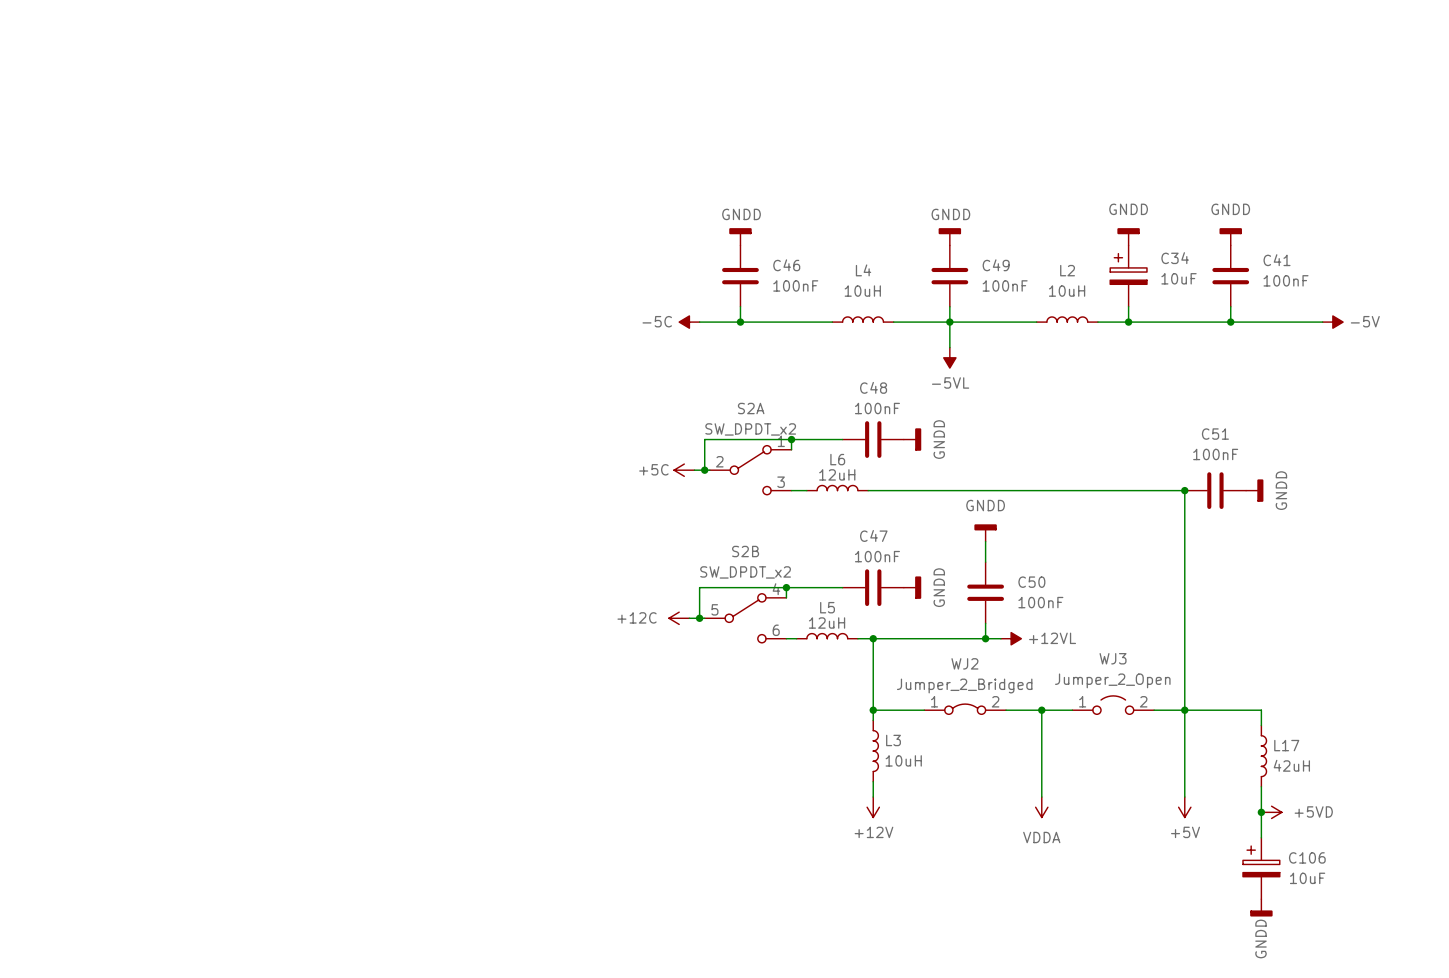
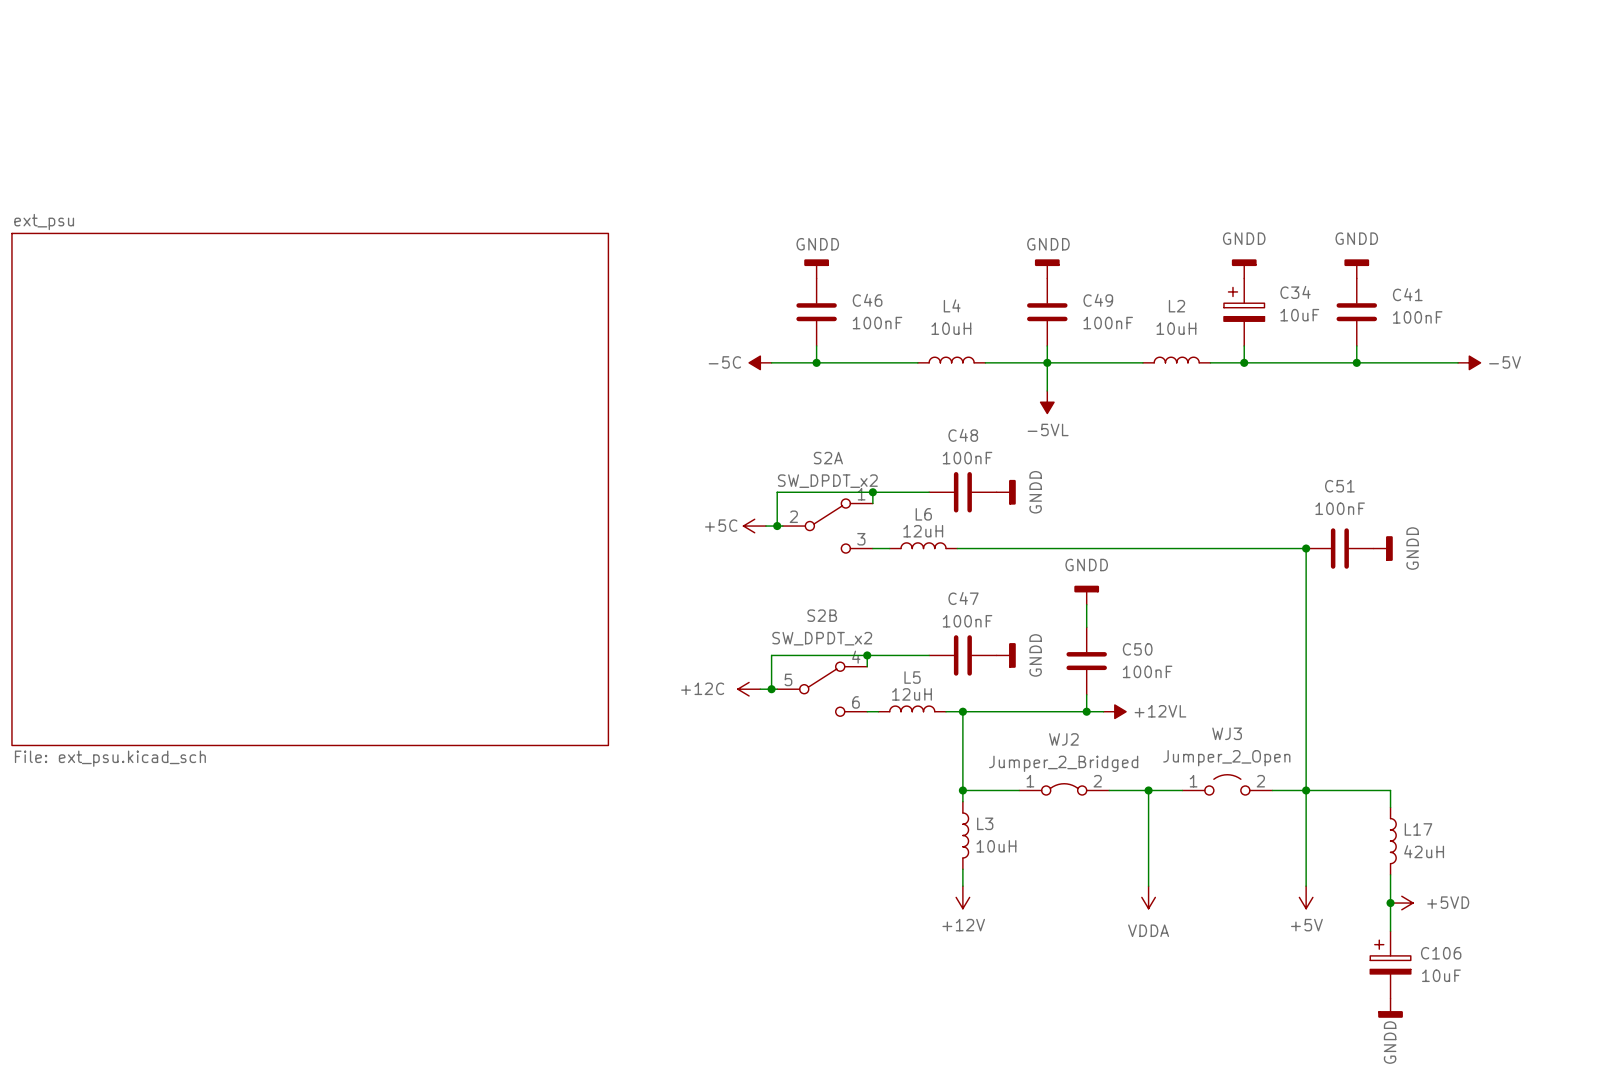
sheet ext_psu: none -> File: ext_psu.kicad_sch (310, 489)

